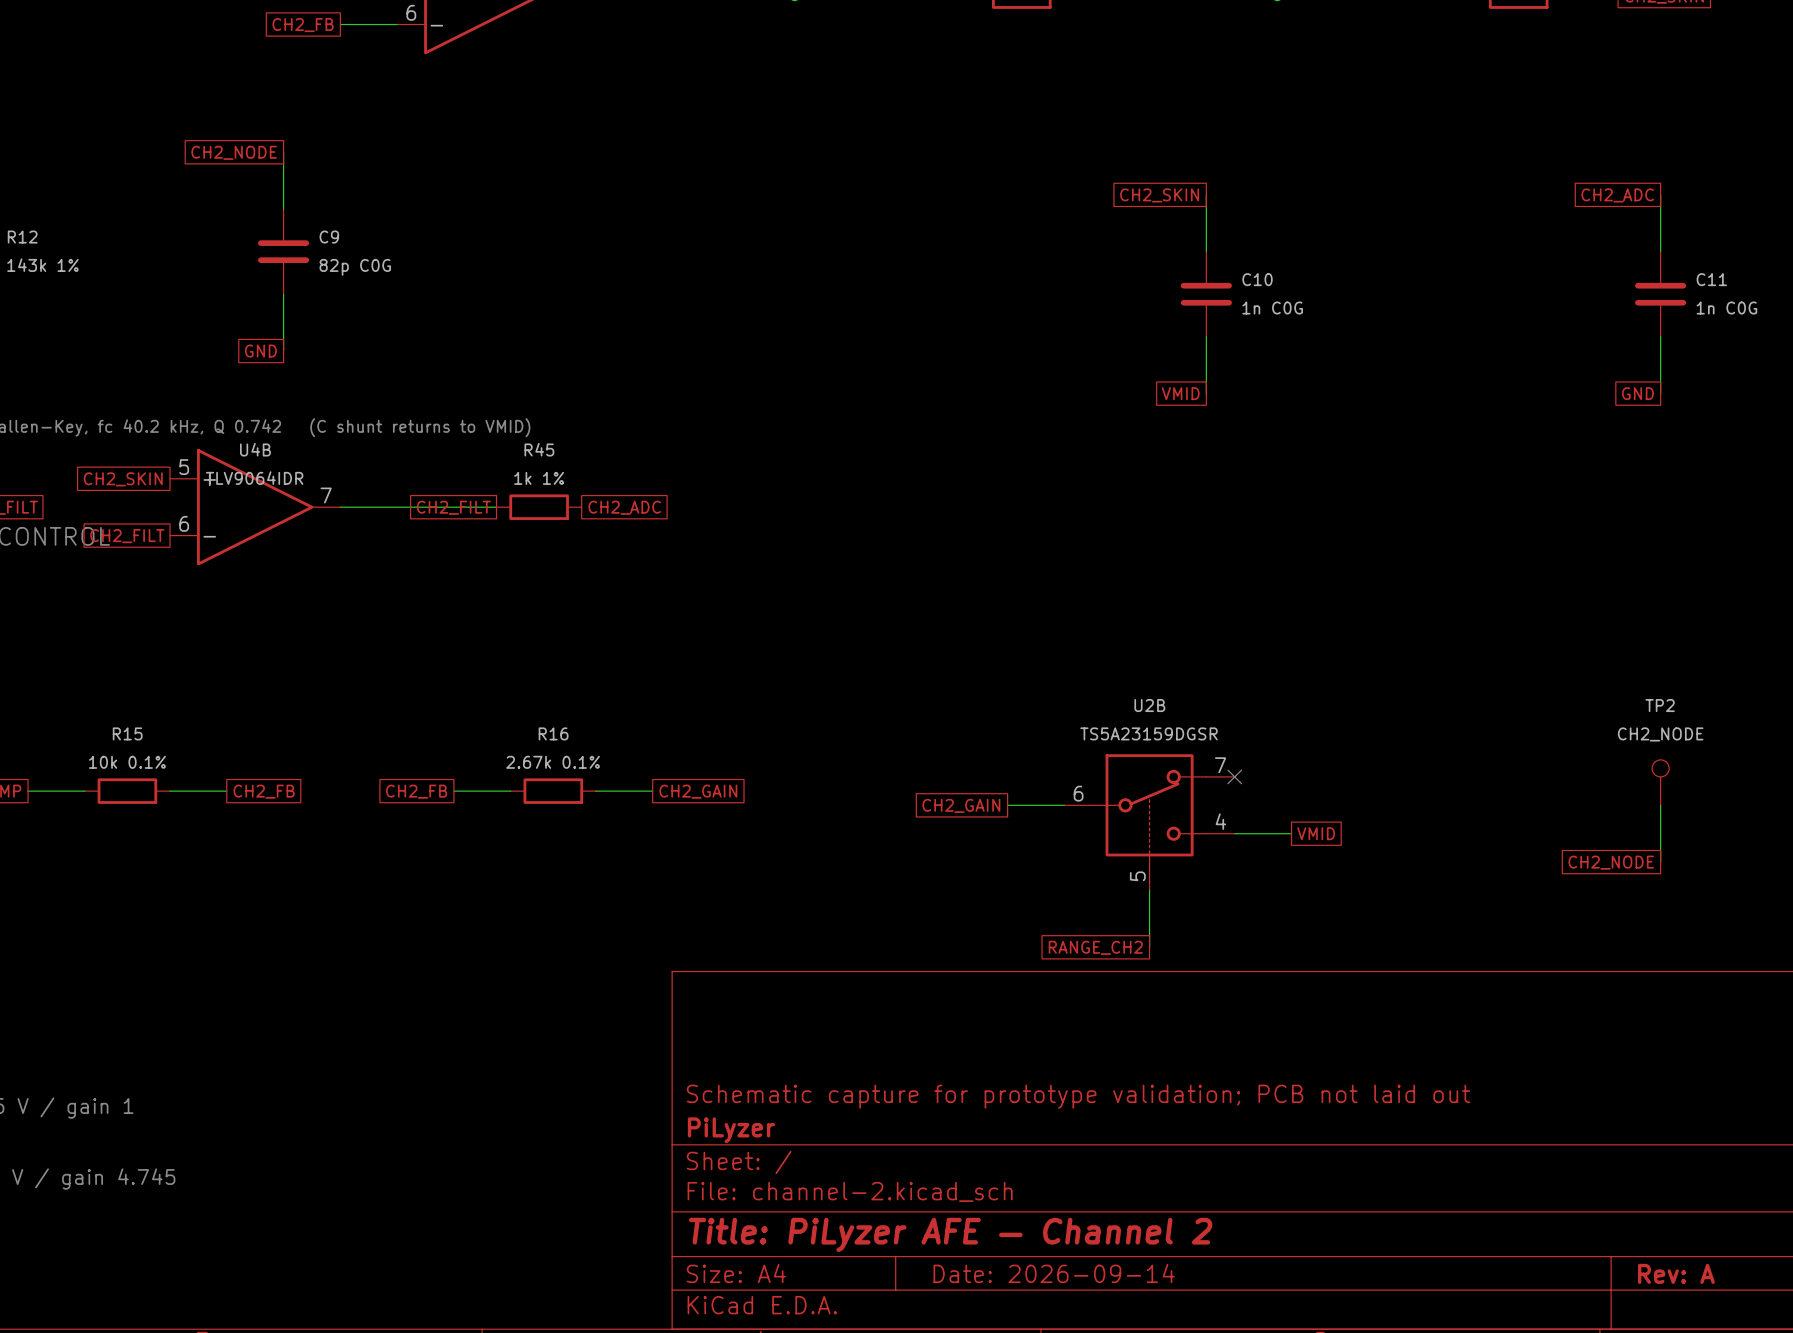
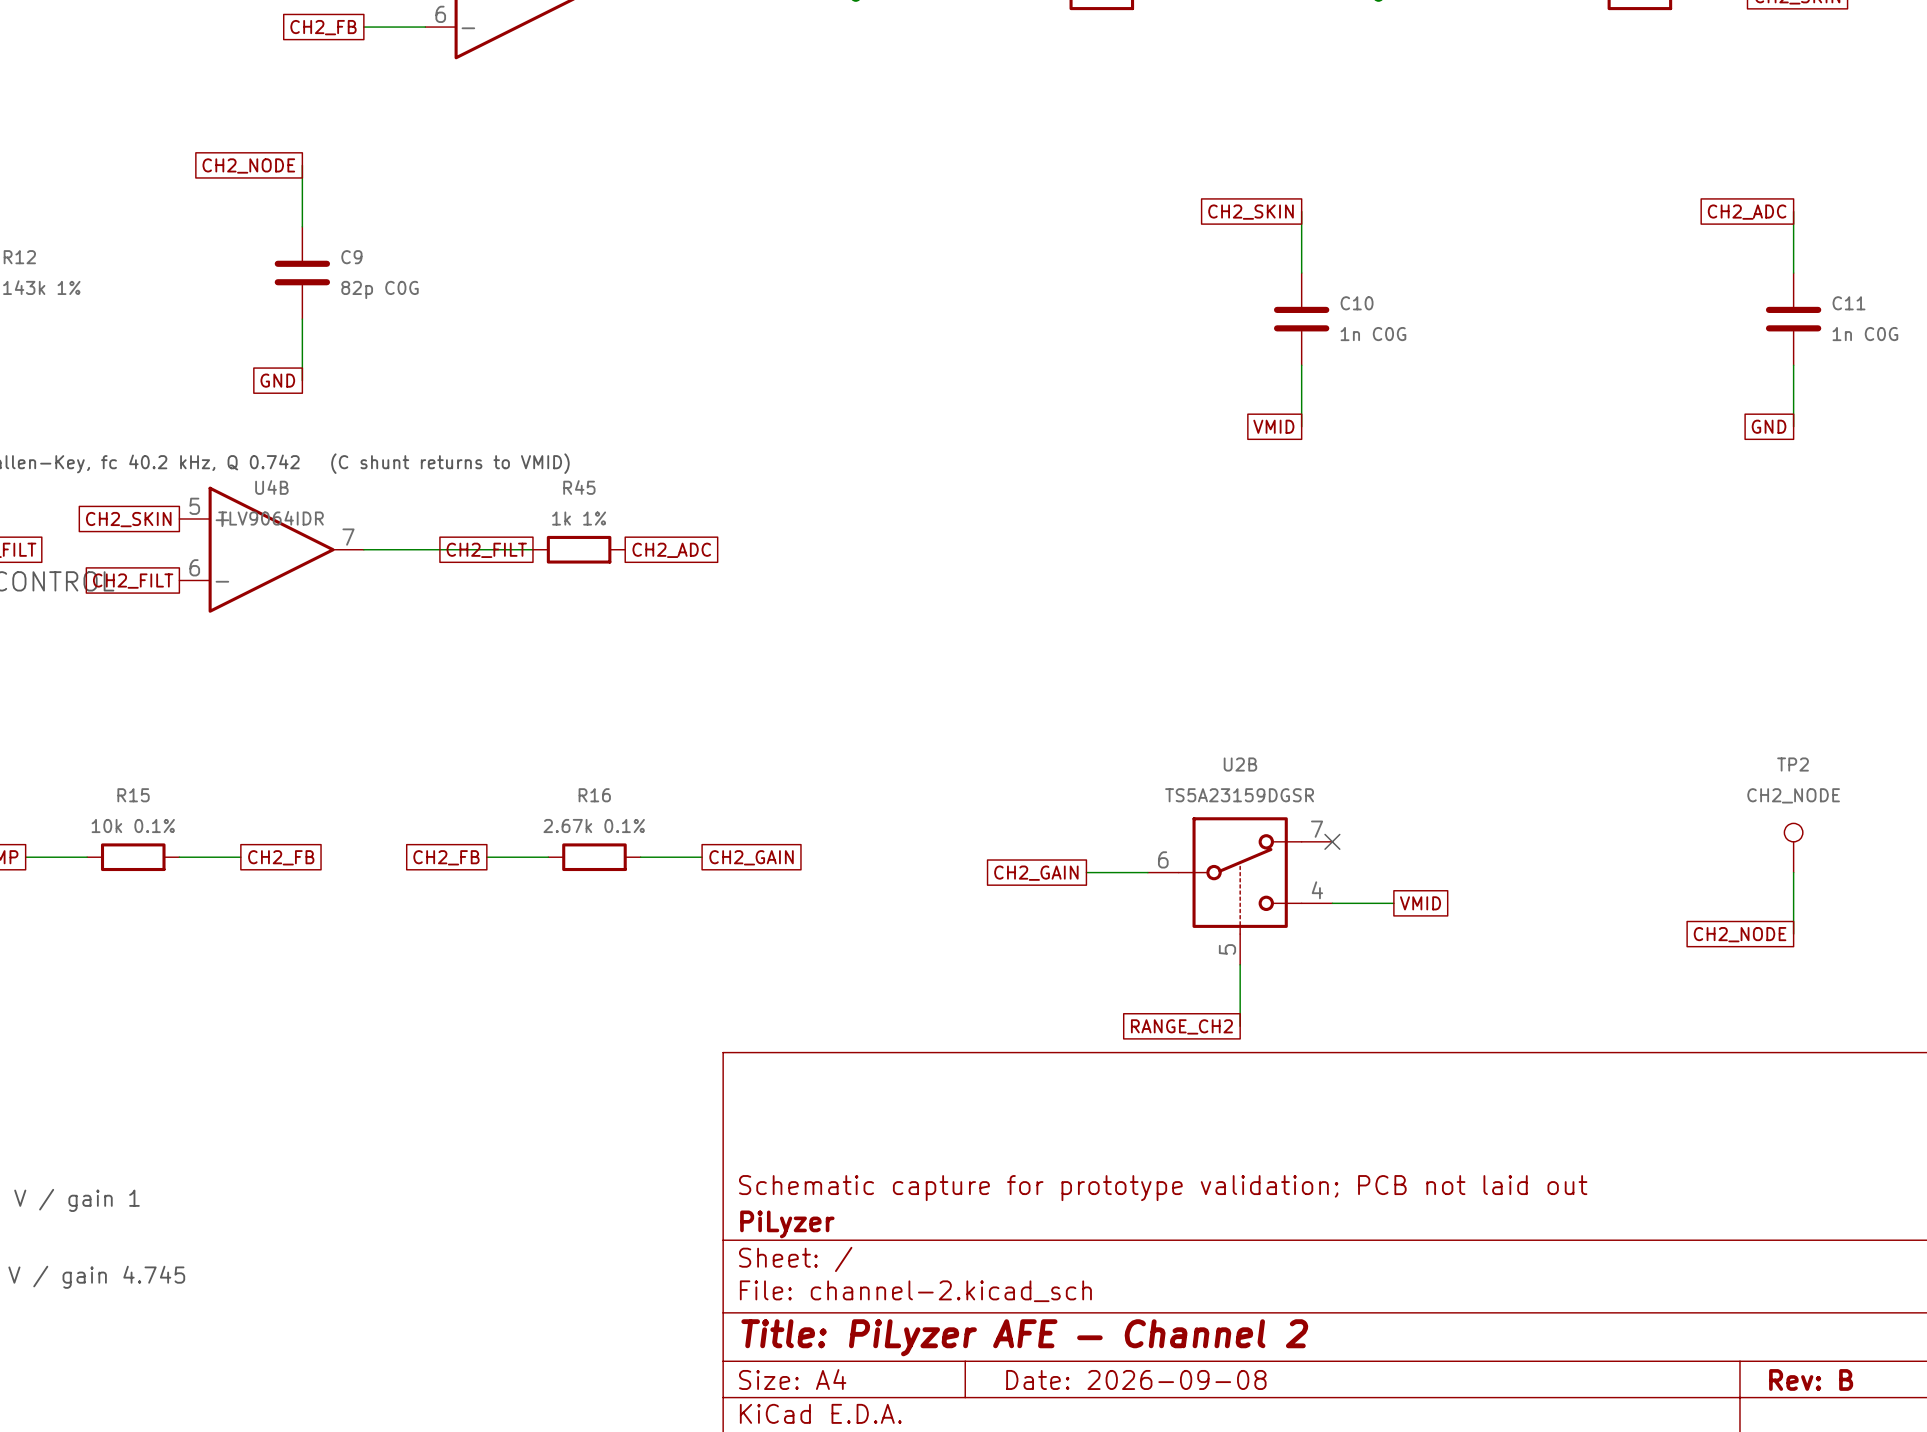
title block: Date: 2026-09-14 (1054, 1273) -> Date: 2026-09-08 (1136, 1379)
title block: Rev: A (1676, 1273) -> Rev: B (1811, 1379)

